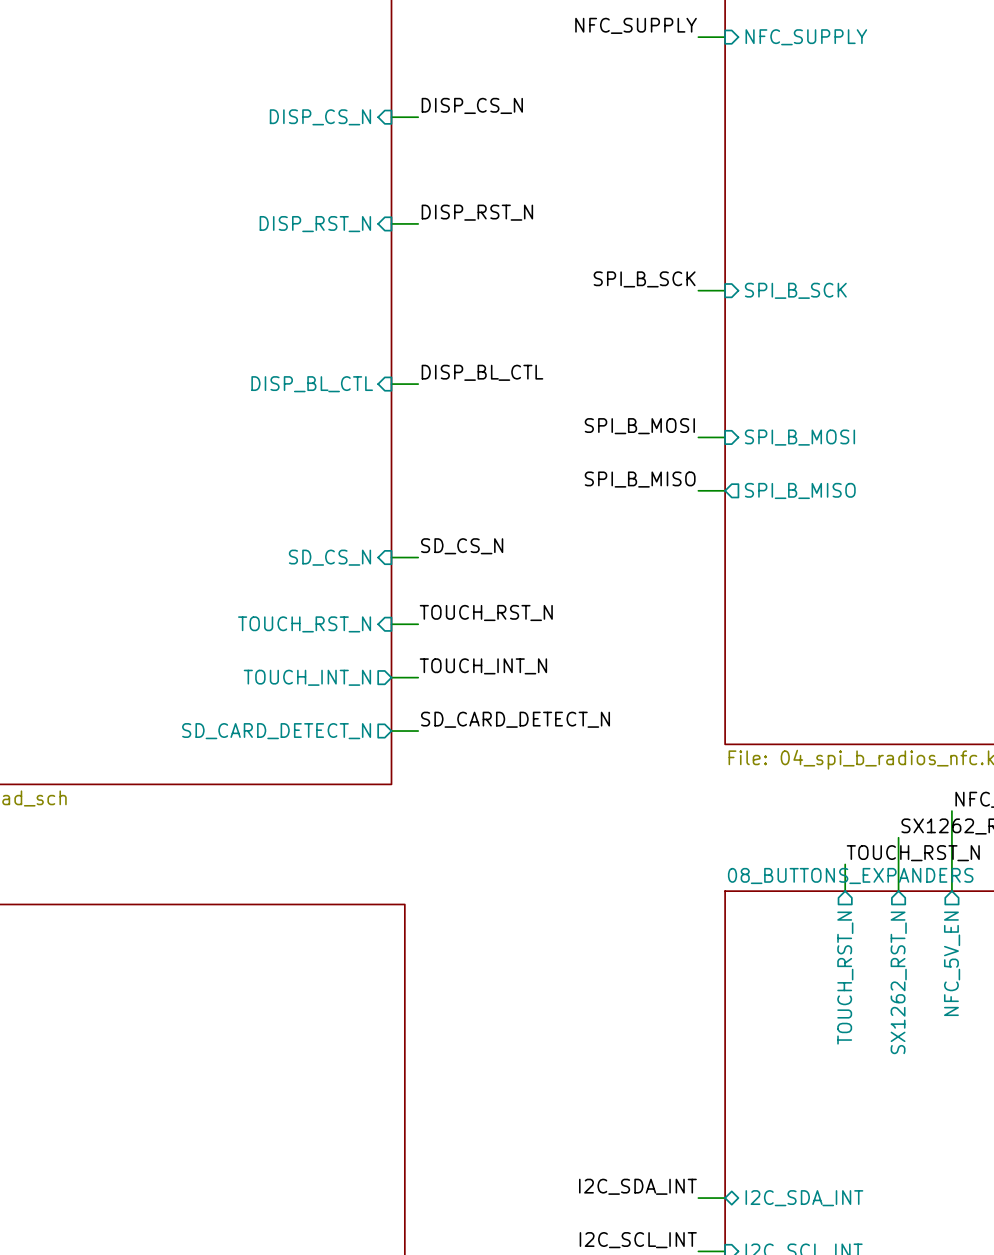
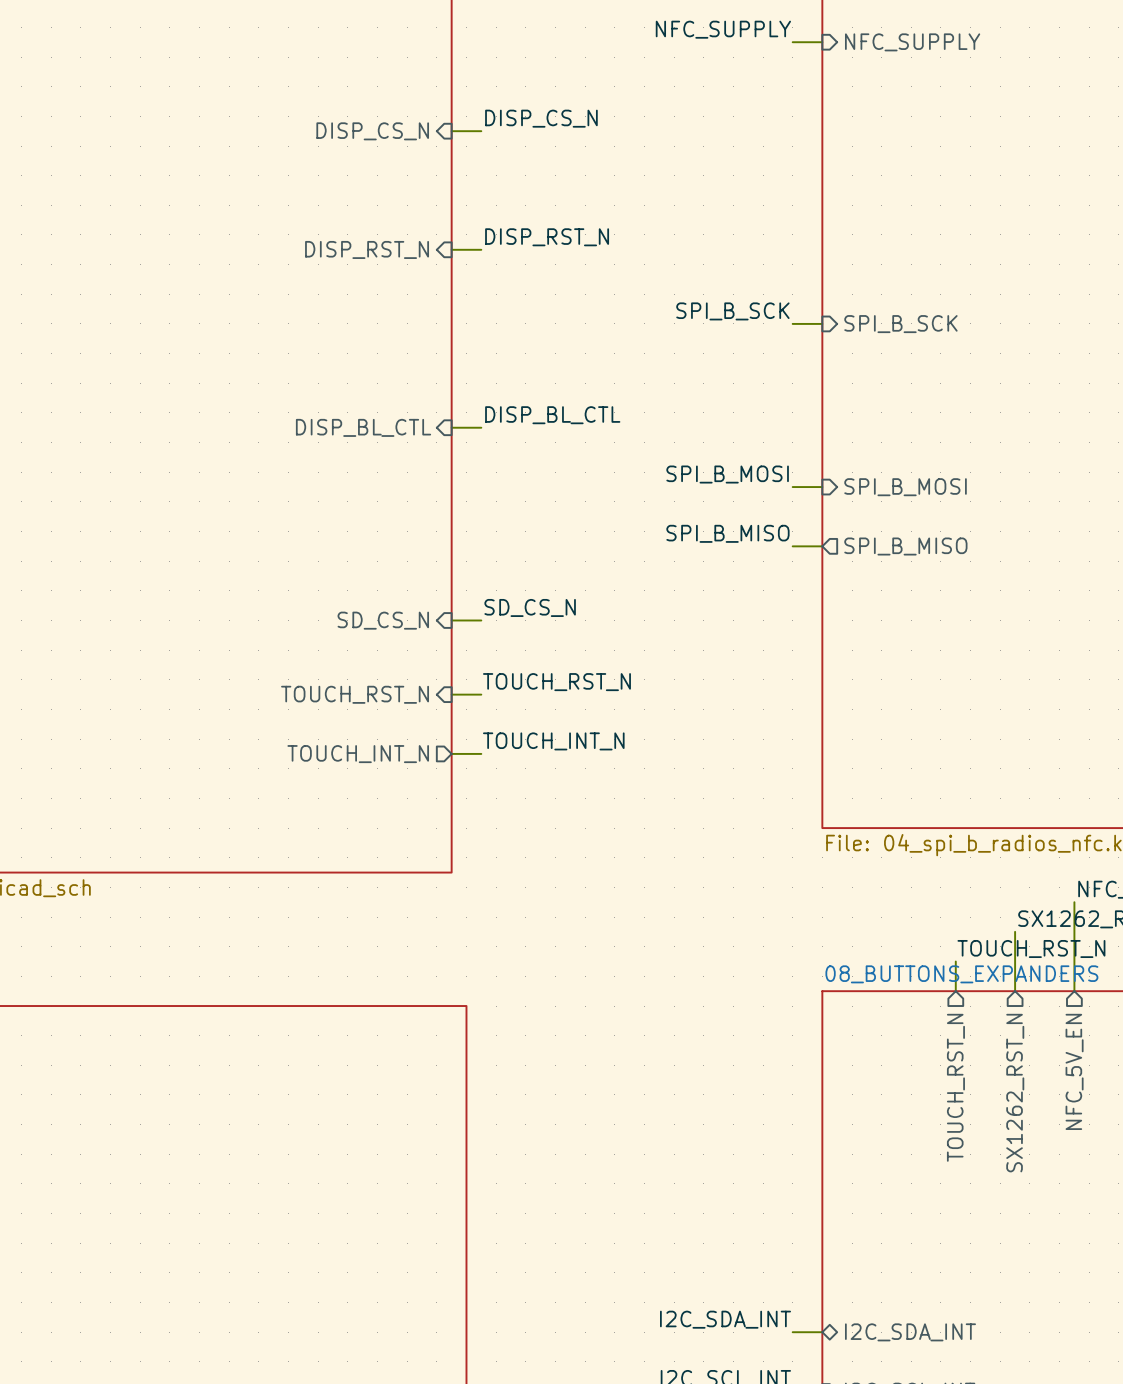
label: SD_CARD_DETECT_N (515, 719) -> none
sheet pin: SD_CARD_DETECT_N (276, 731) -> none
wire: (391, 731) (418, 731) -> none

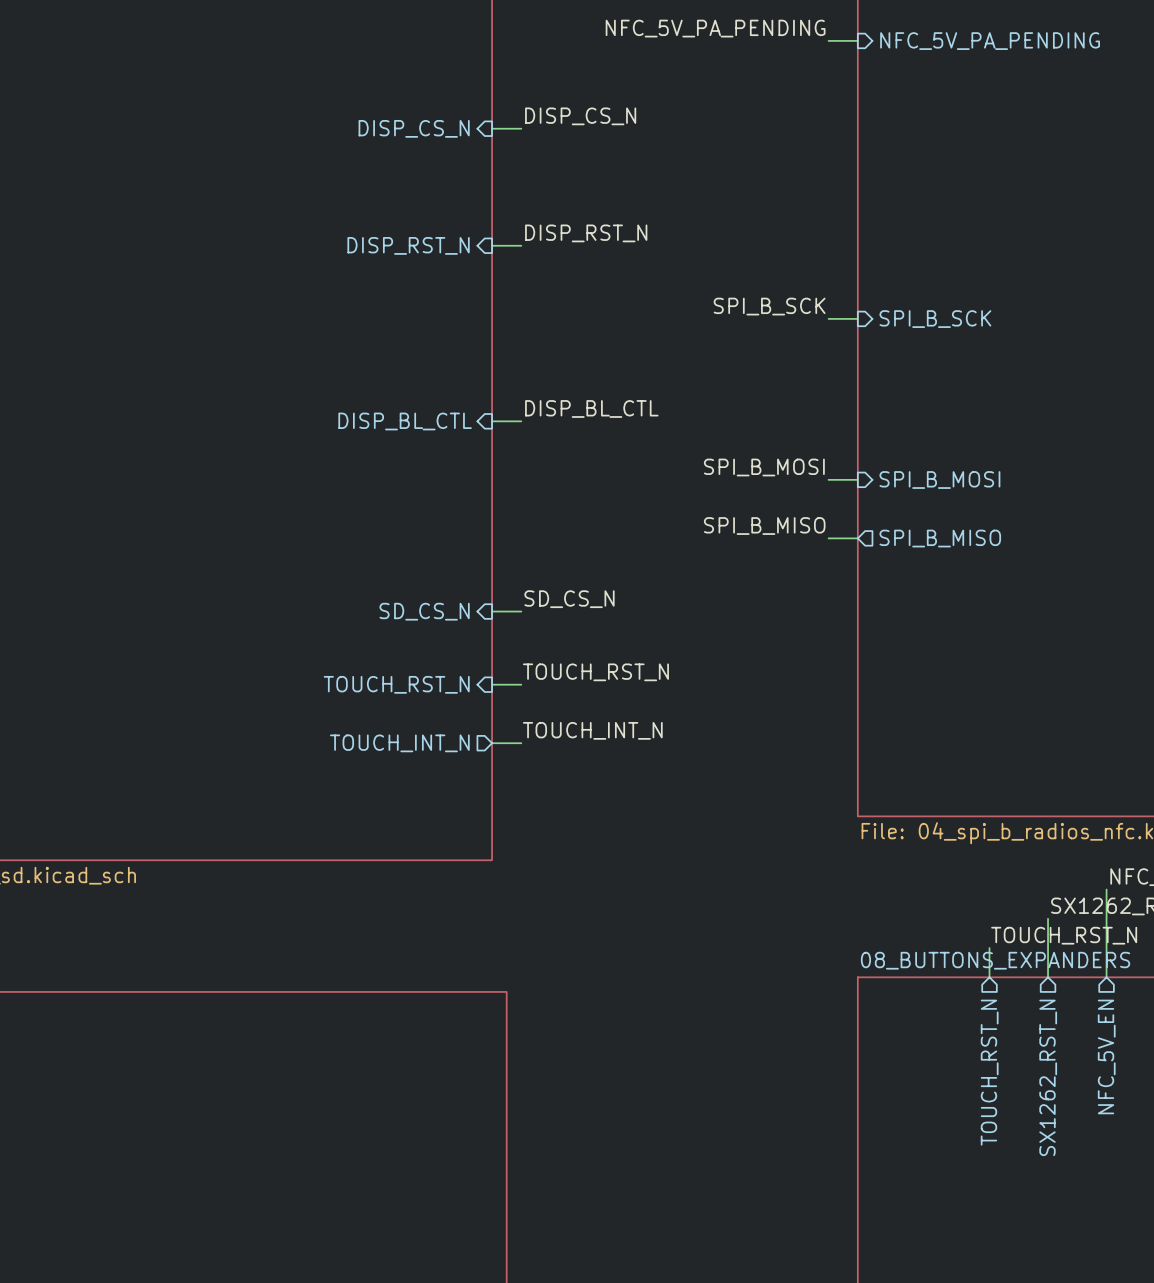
label: NFC_SUPPLY (723, 29) -> NFC_5V_PA_PENDING (715, 28)
sheet pin: NFC_SUPPLY (912, 42) -> NFC_5V_PA_PENDING (990, 41)

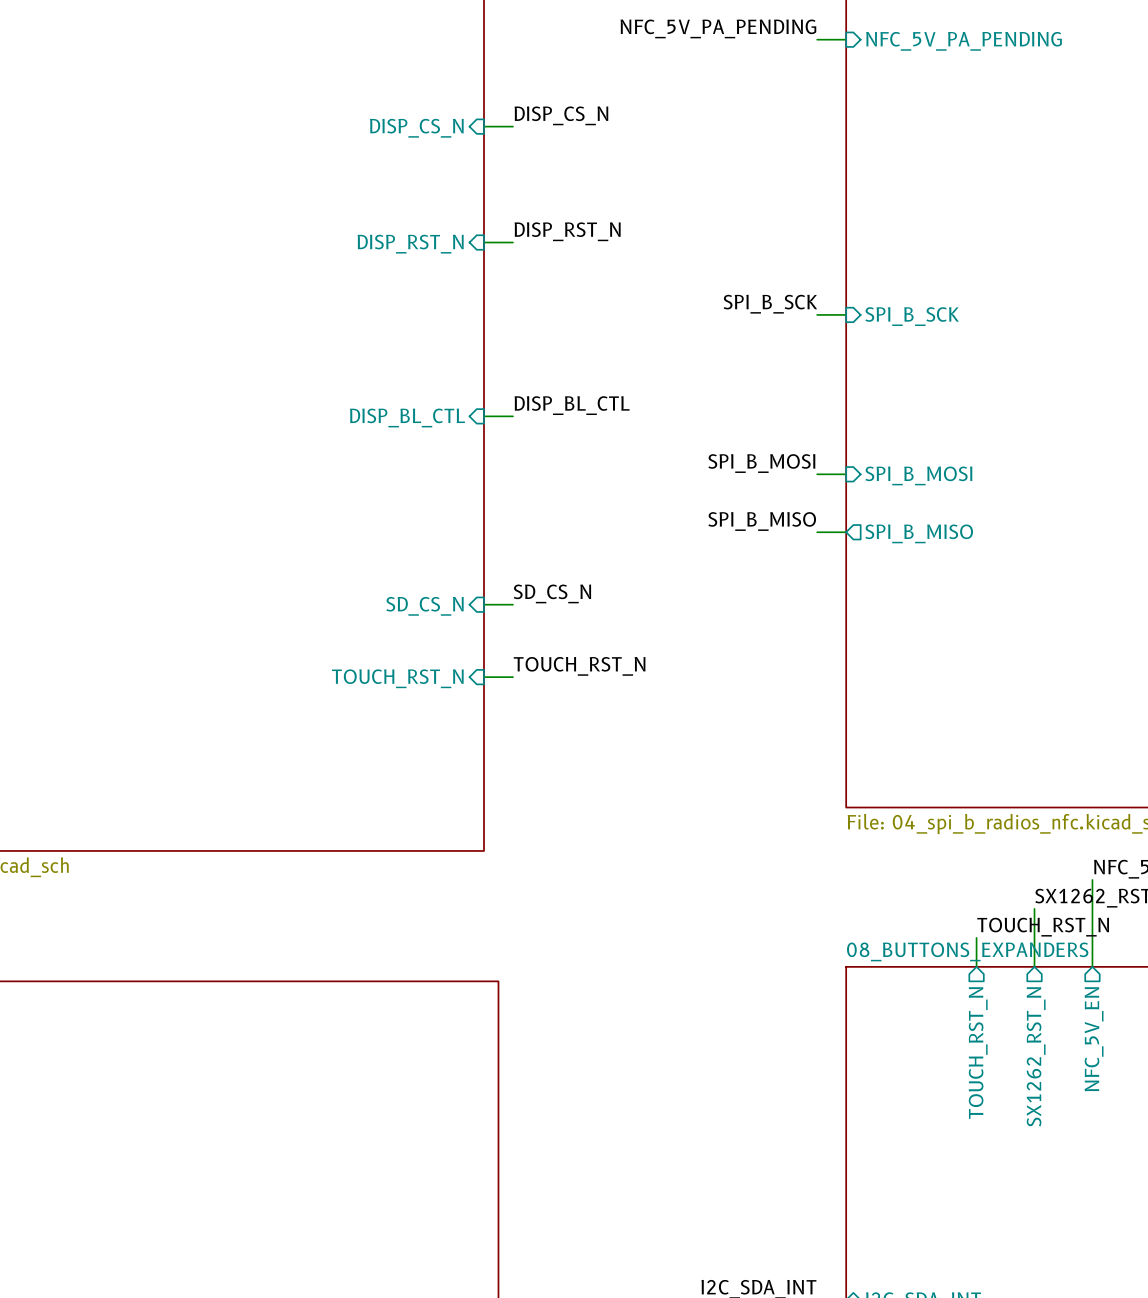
label: TOUCH_INT_N (592, 730) -> none
sheet pin: TOUCH_INT_N (399, 743) -> none
wire: (492, 743) (521, 743) -> none

